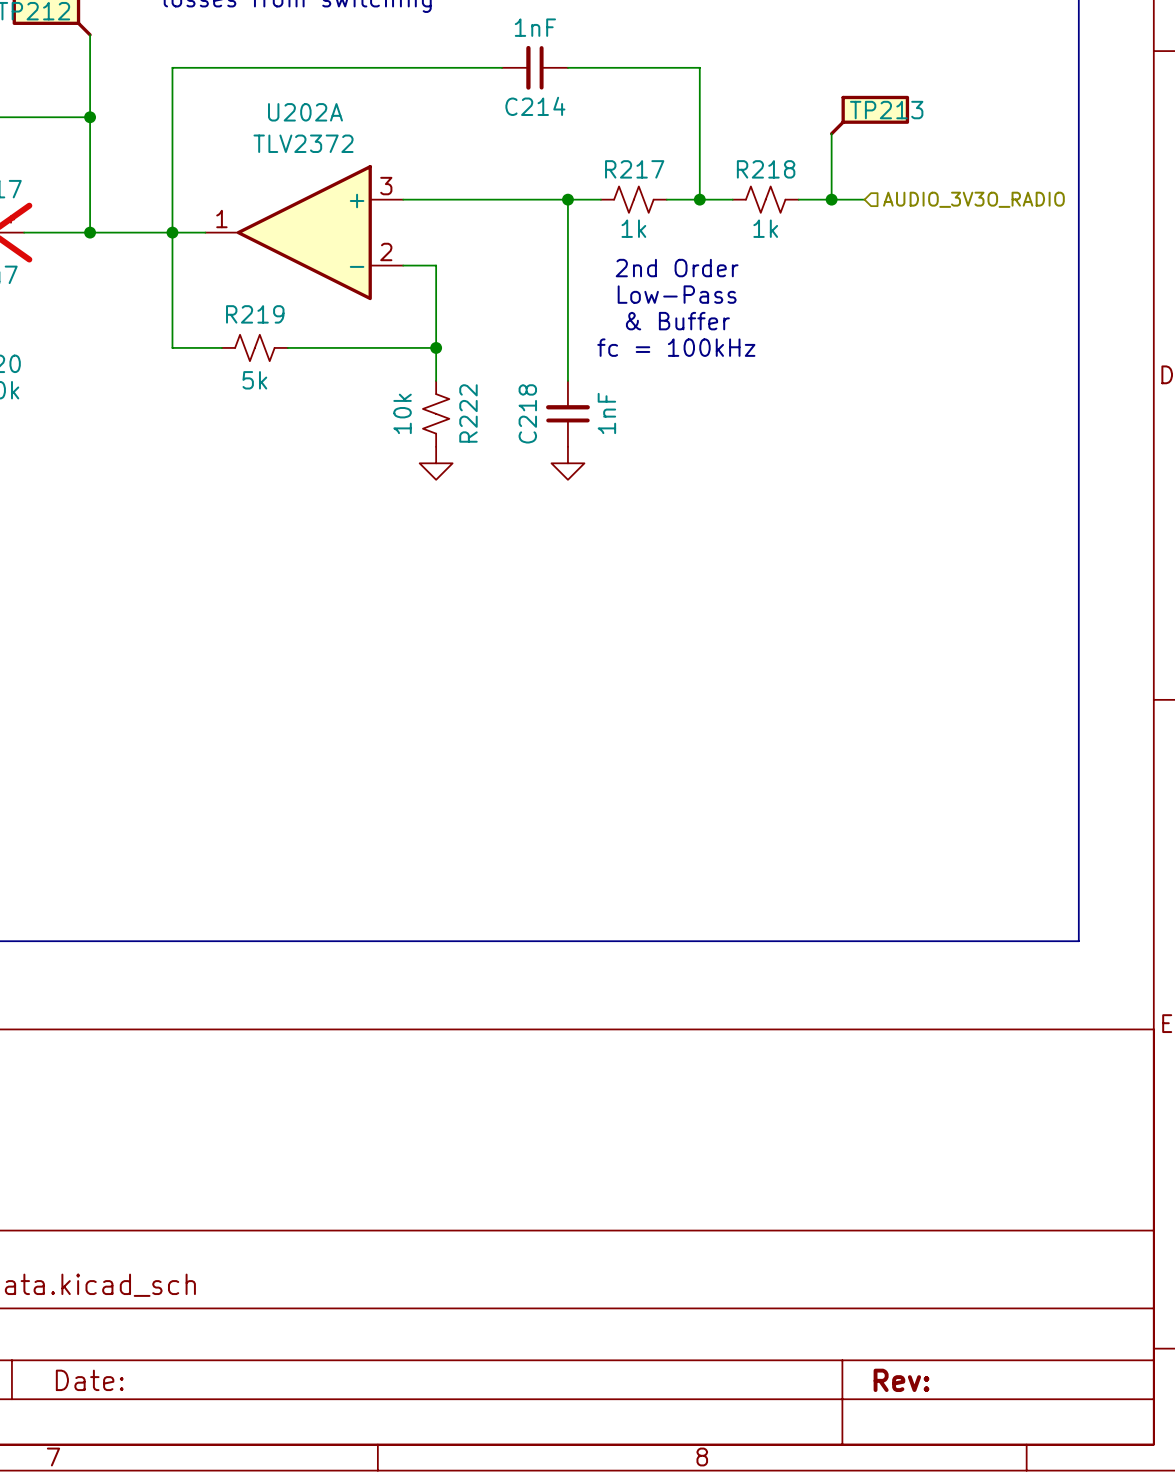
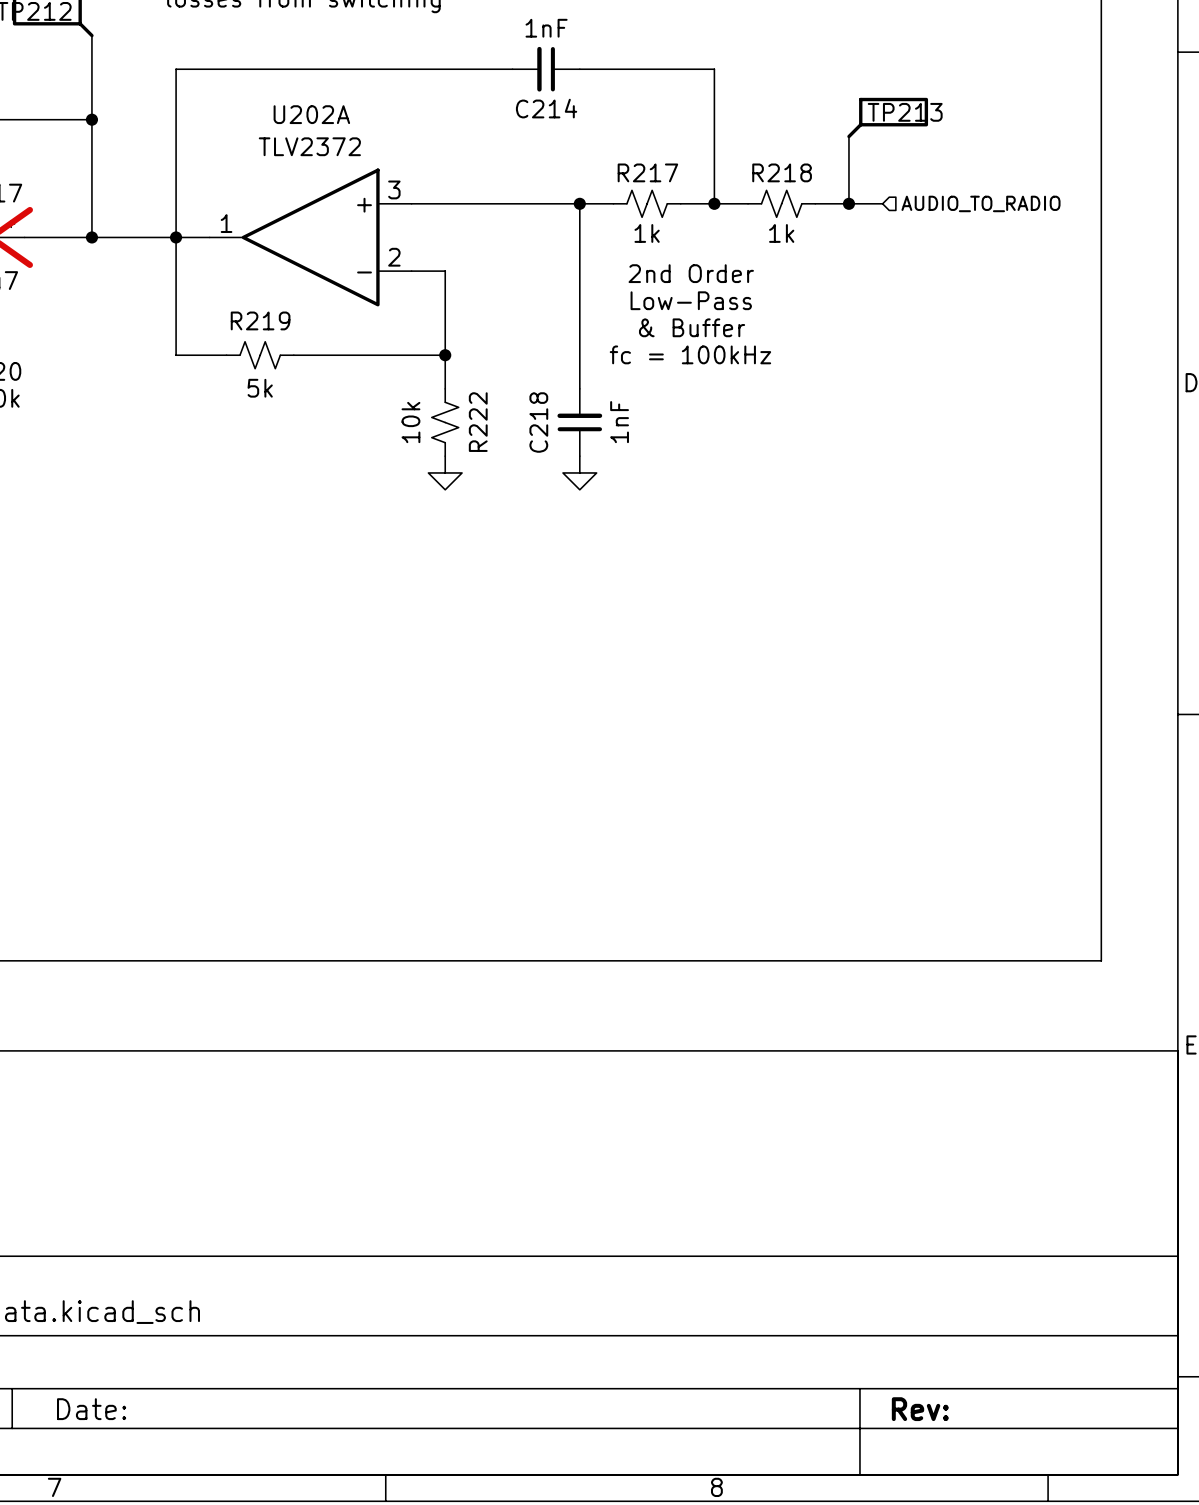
hierarchical label: AUDIO_3V3O_RADIO (973, 199) -> AUDIO_TO_RADIO (980, 203)

